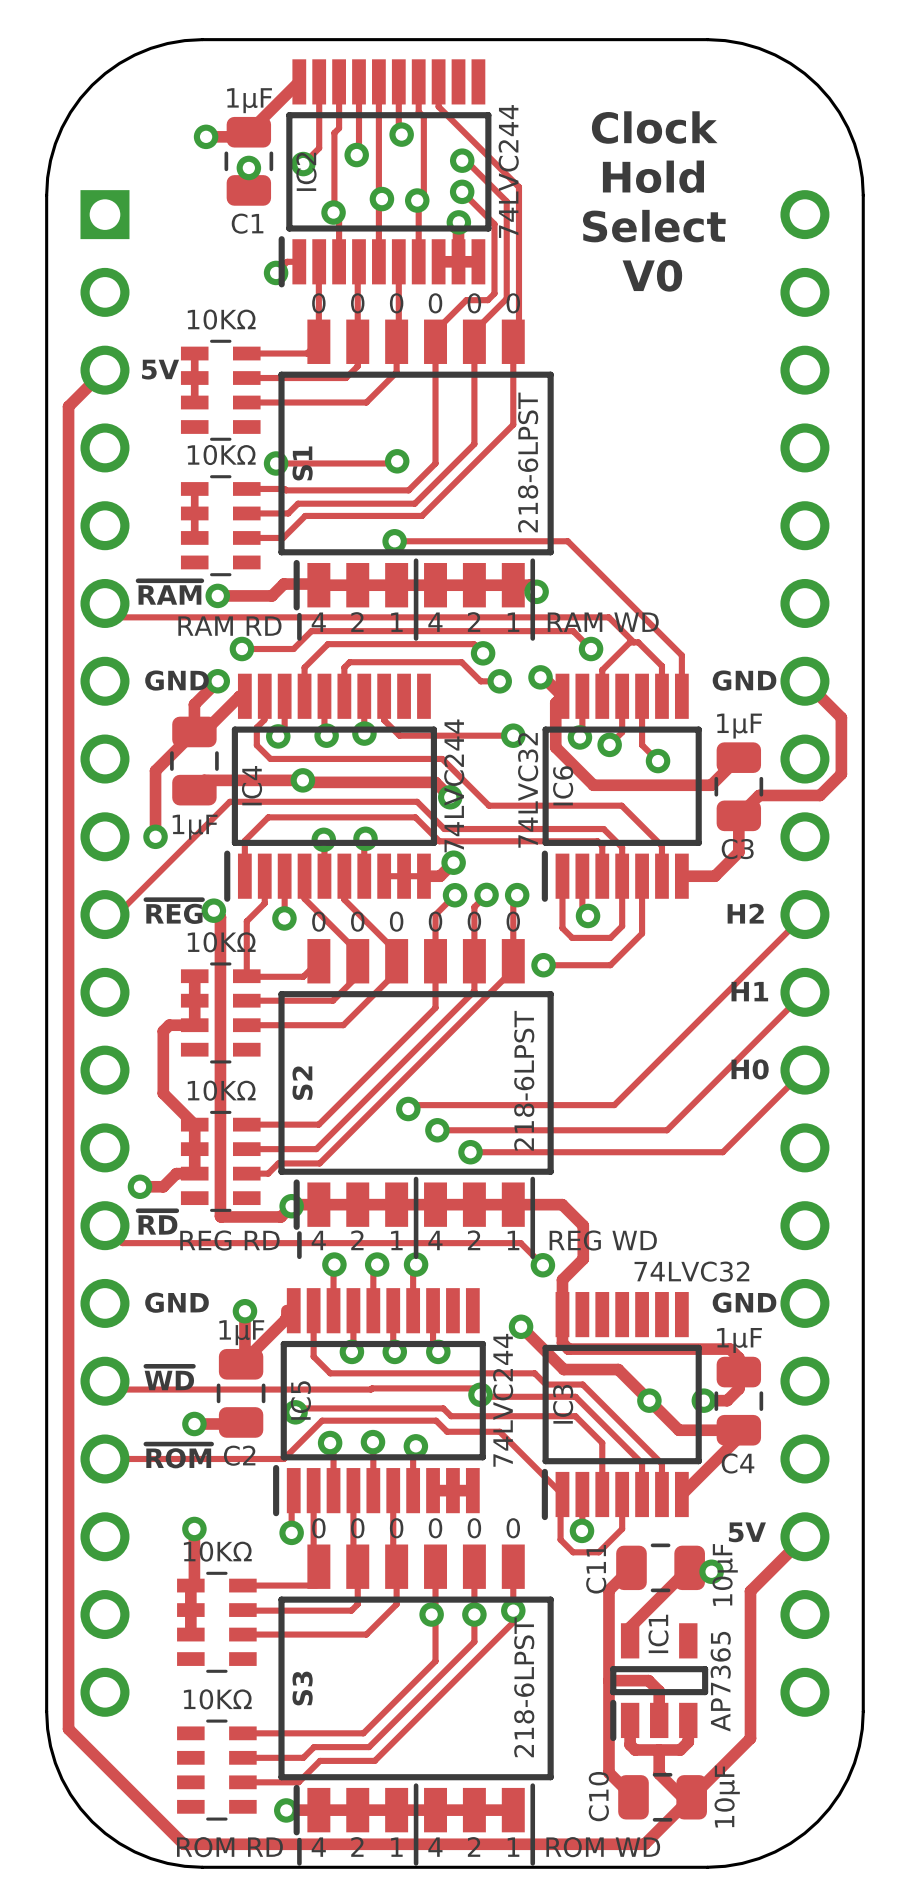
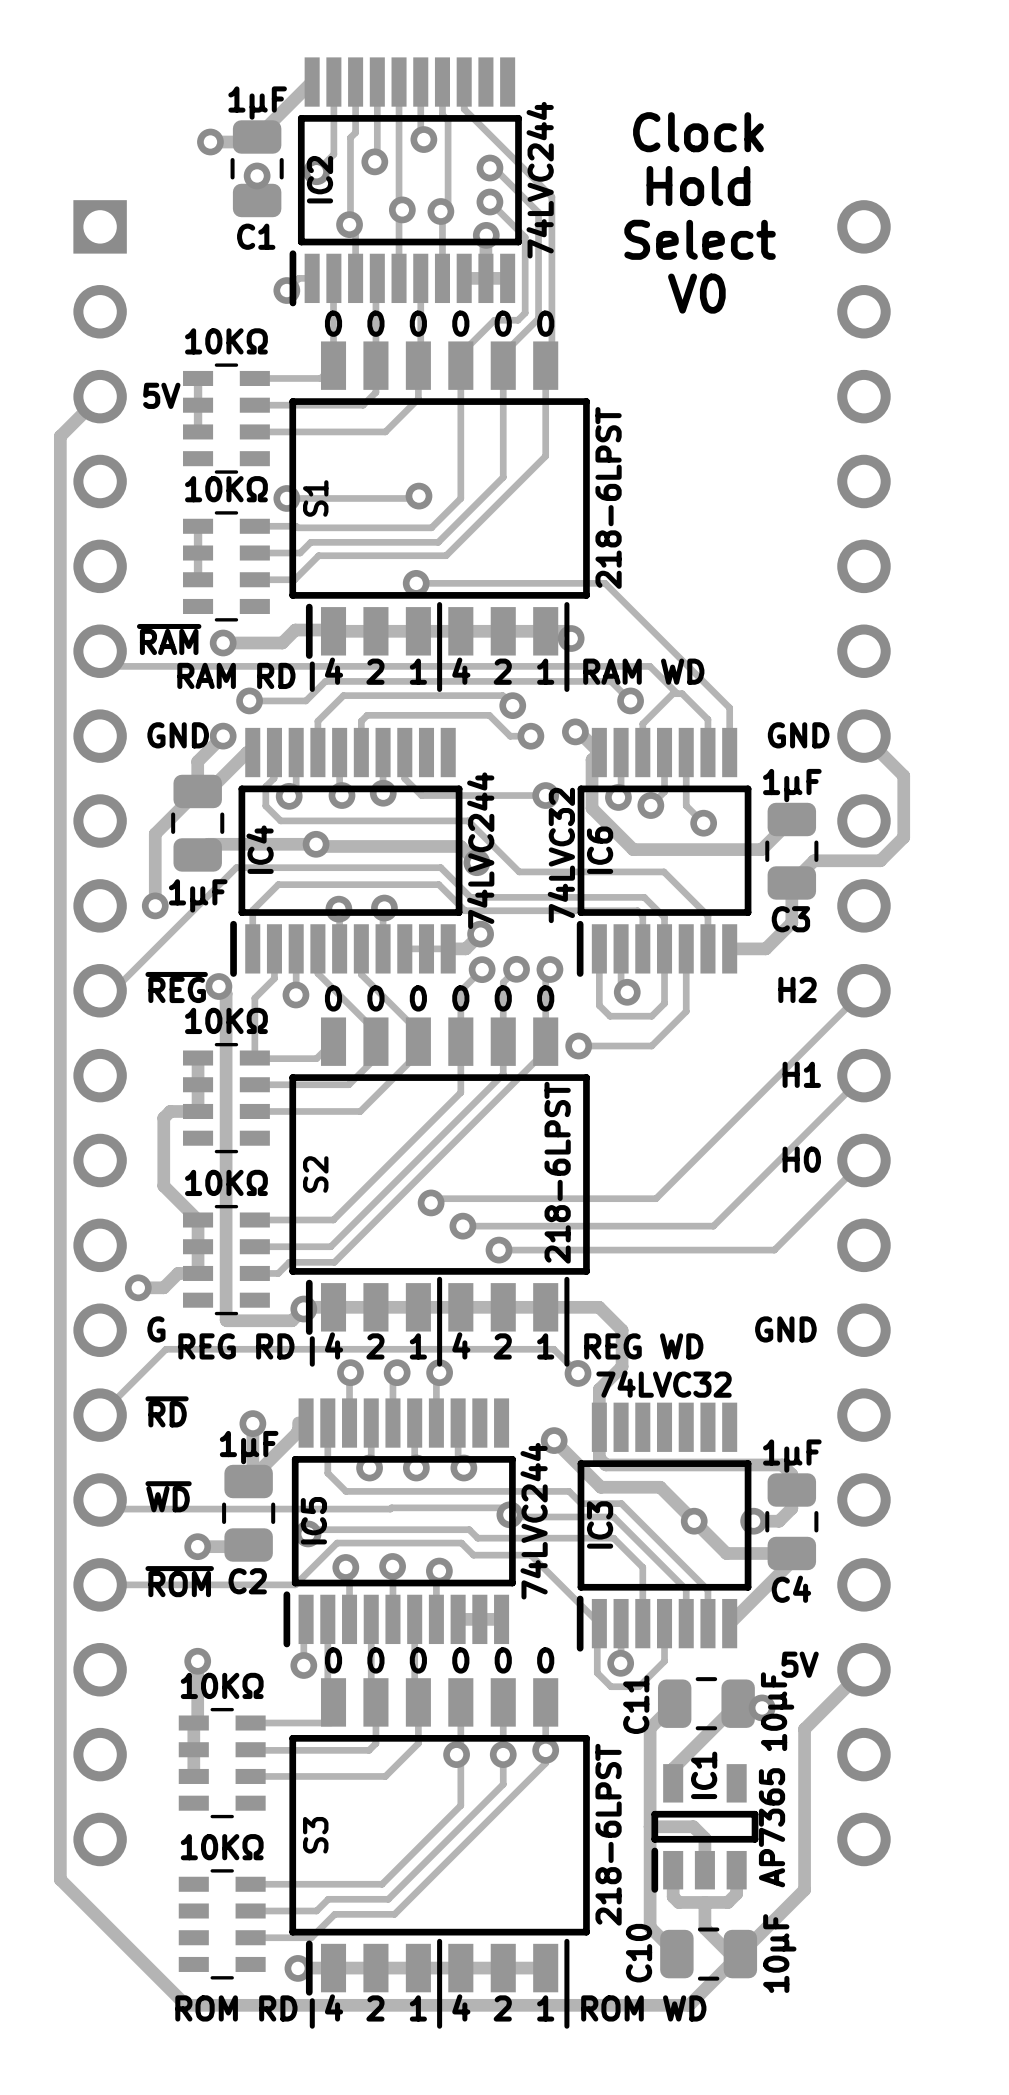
board edge: (202, 39) (725, 40) (759, 48) (775, 55) (804, 73) (829, 98) (839, 112) (854, 143) (862, 177) (863, 195) (863, 1711) (859, 1746) (854, 1763) (839, 1794) (817, 1821) (804, 1833) (790, 1843) (759, 1858) (725, 1866) (707, 1867) (184, 1866) (150, 1858) (119, 1843) (105, 1833) (92, 1821) (70, 1794) (55, 1763) (50, 1746) (46, 1711) (47, 177) (50, 160) (62, 127) (80, 98) (92, 85) (119, 63) (150, 48) (184, 40) (202, 39) -> none
S1 text position: 218-6LPST (528, 462) -> 218-6LPST (608, 497)
text: ~{RD} (157, 1222) -> G (156, 1329)
track: (104, 1225) (122, 1243) (165, 1243) -> (100, 1415) (165, 1349)
IC3 text position: 74LVC32 (691, 1271) -> 74LVC32 (664, 1384)
text: GND (177, 1302) -> ~{RD} (167, 1411)
text position: GND (744, 1302) -> GND (785, 1329)
S3 text position: 218-6LPST (524, 1687) -> 218-6LPST (608, 1834)

